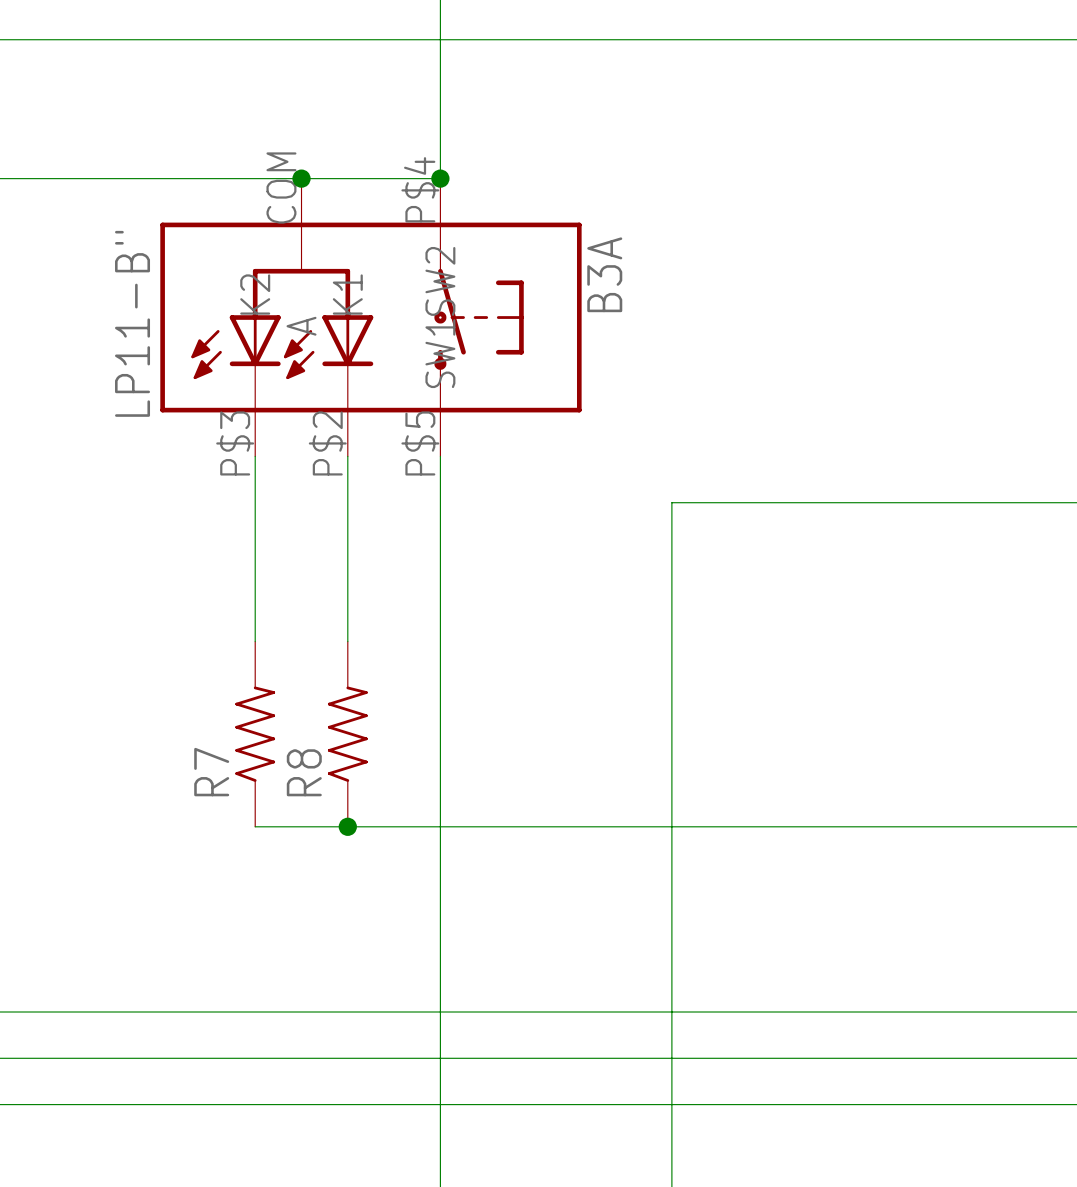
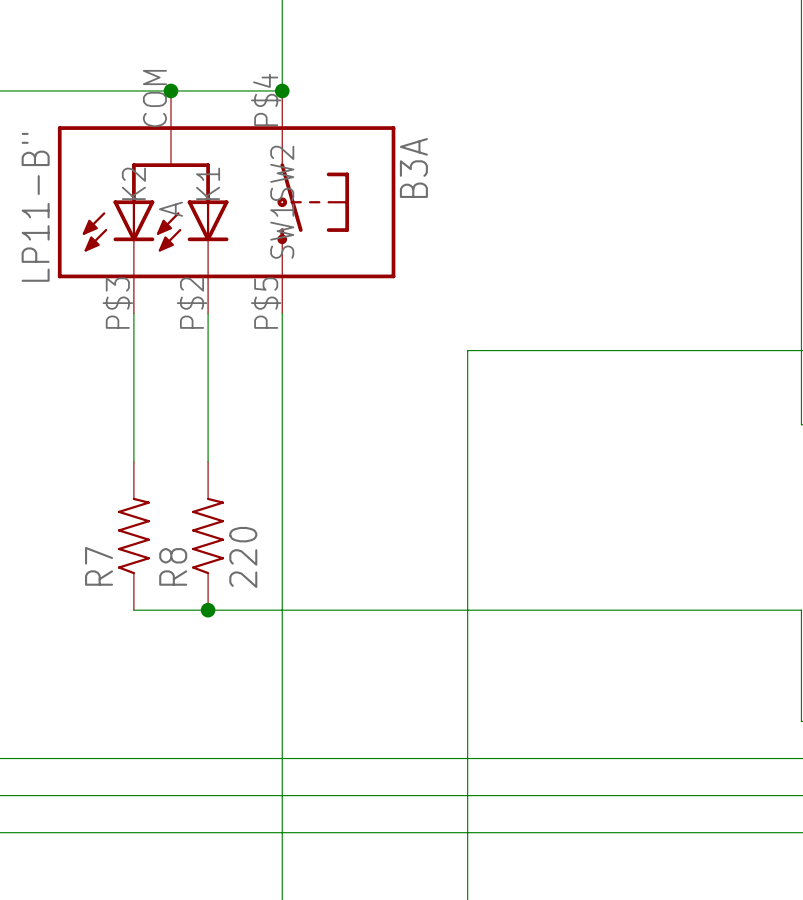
R8 value: none -> 220 (243, 557)

